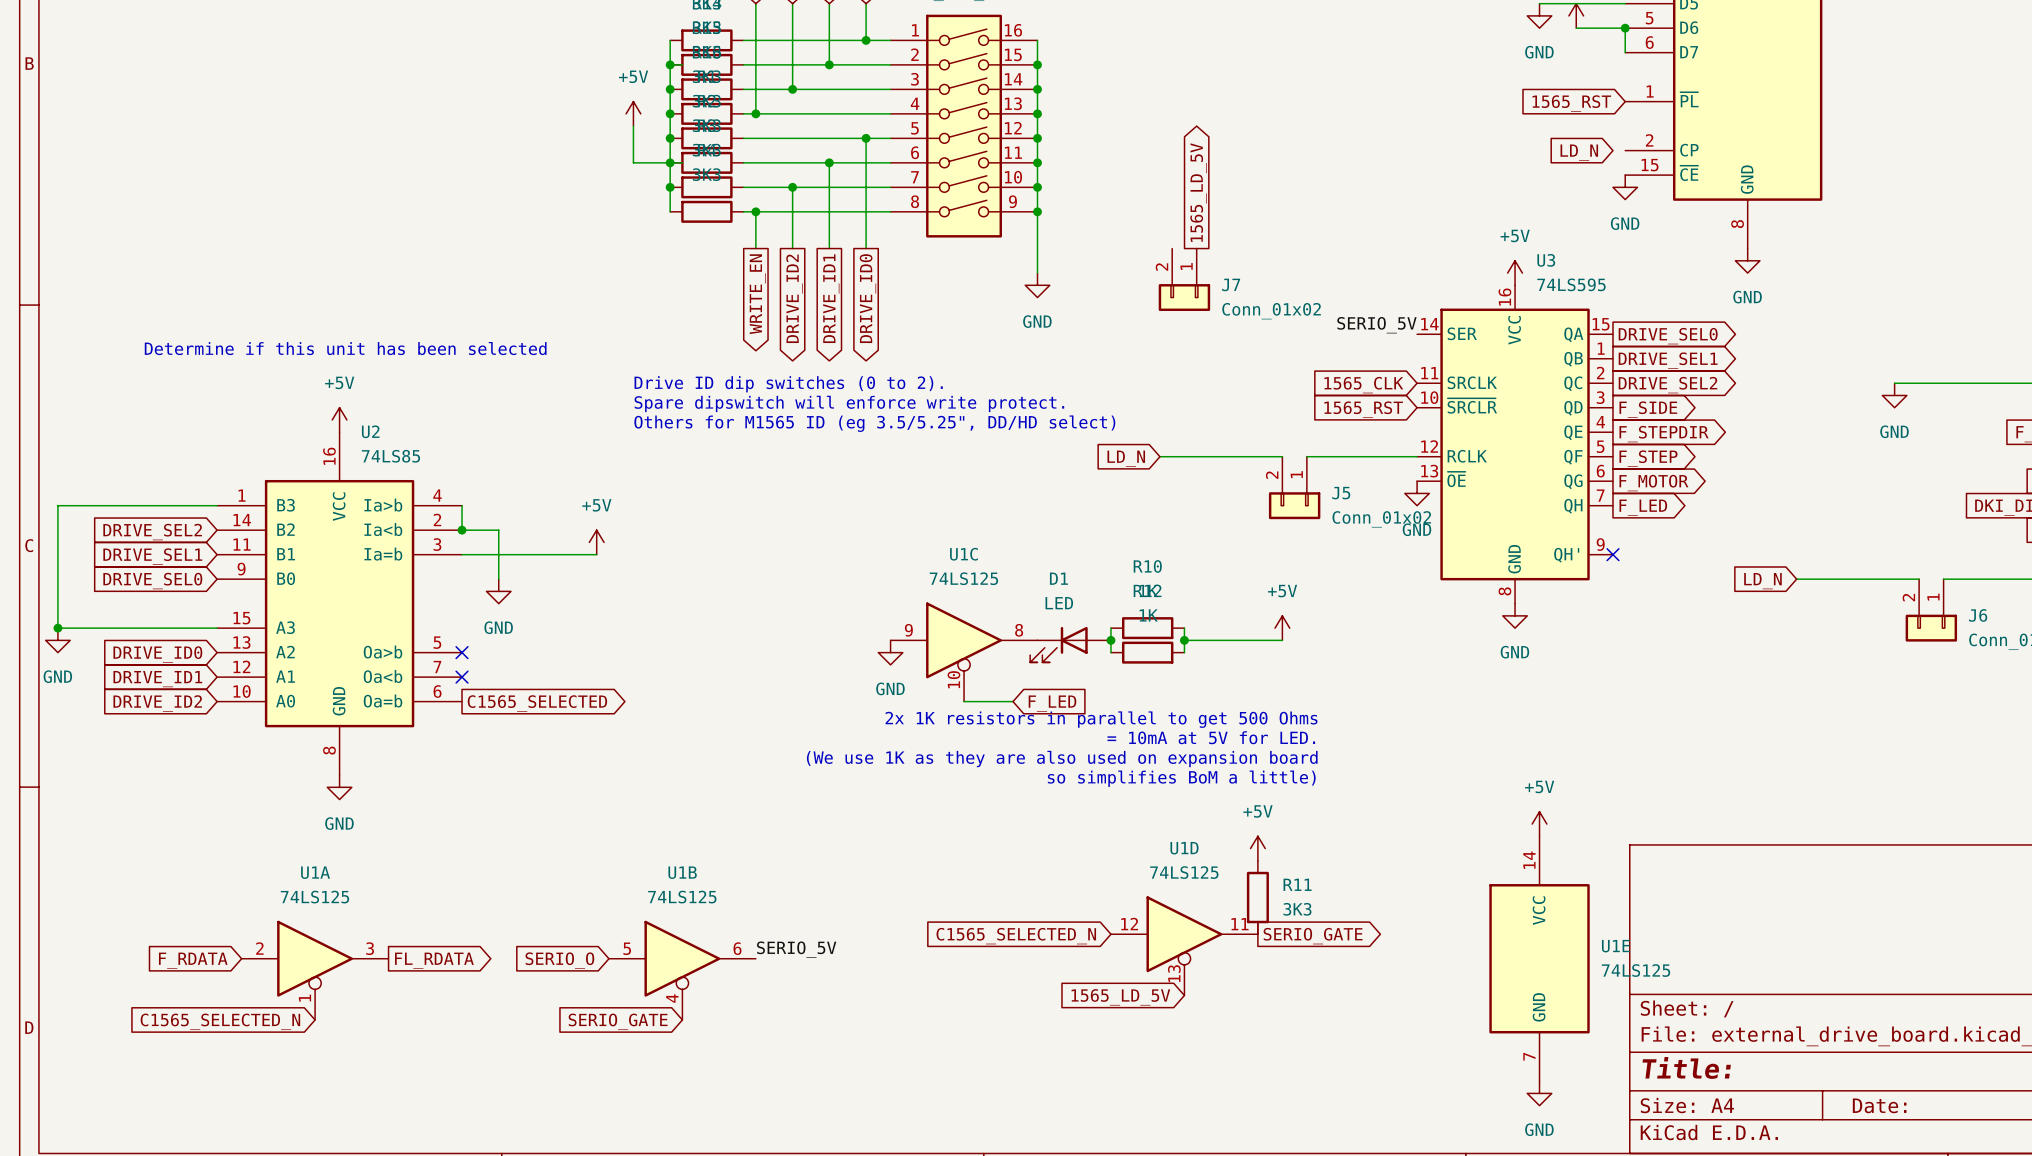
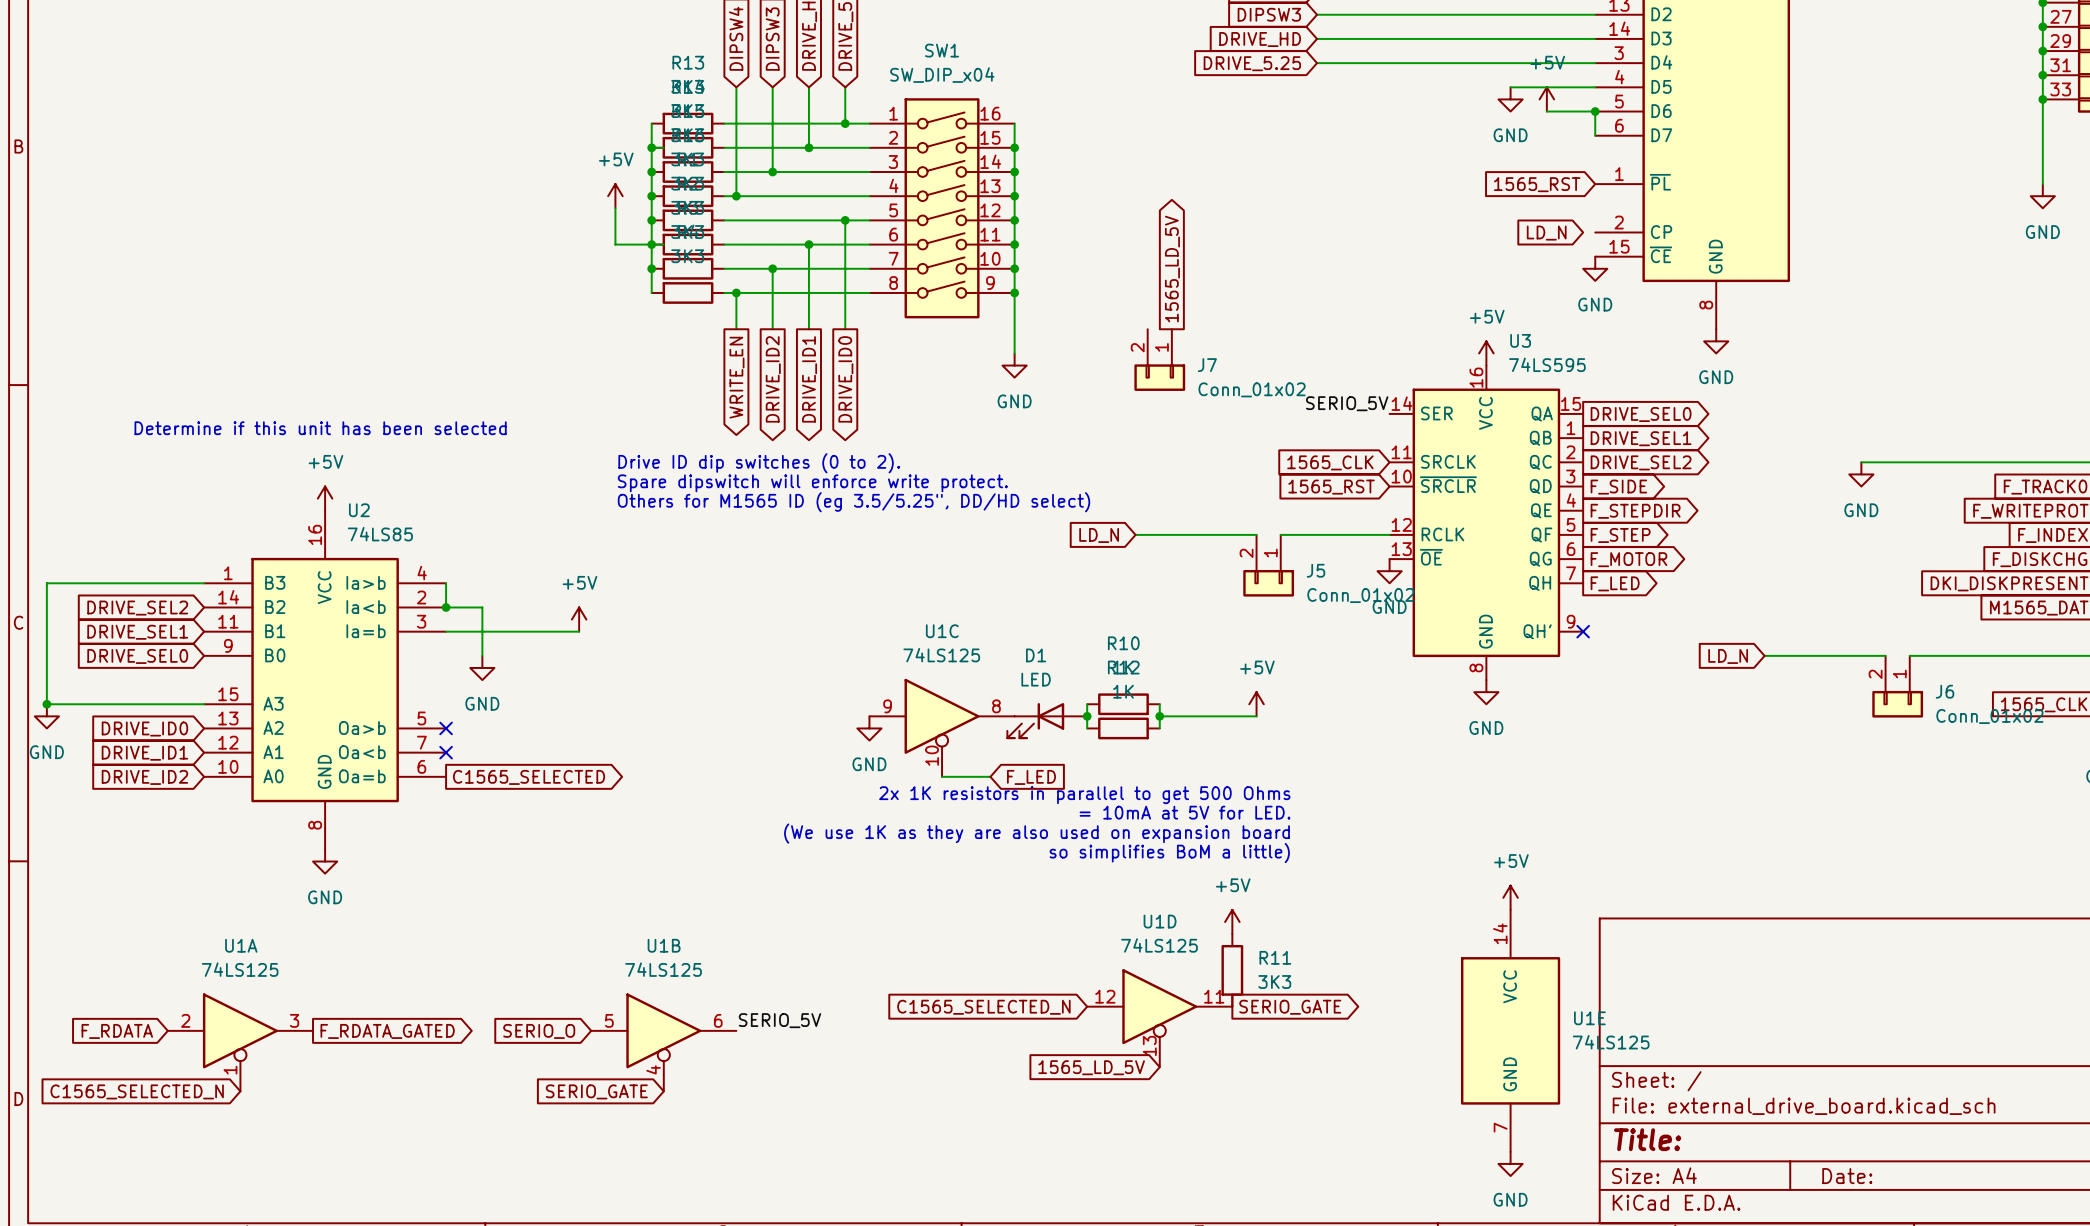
global label position: F_RDATA (193, 960) -> F_RDATA (117, 1031)
global label: FL_RDATA (434, 960) -> F_RDATA_GATED (387, 1031)
U1A position: (315, 970) -> (240, 1042)
global label position: C1565_SELECTED_N (220, 1021) -> C1565_SELECTED_N (137, 1091)

